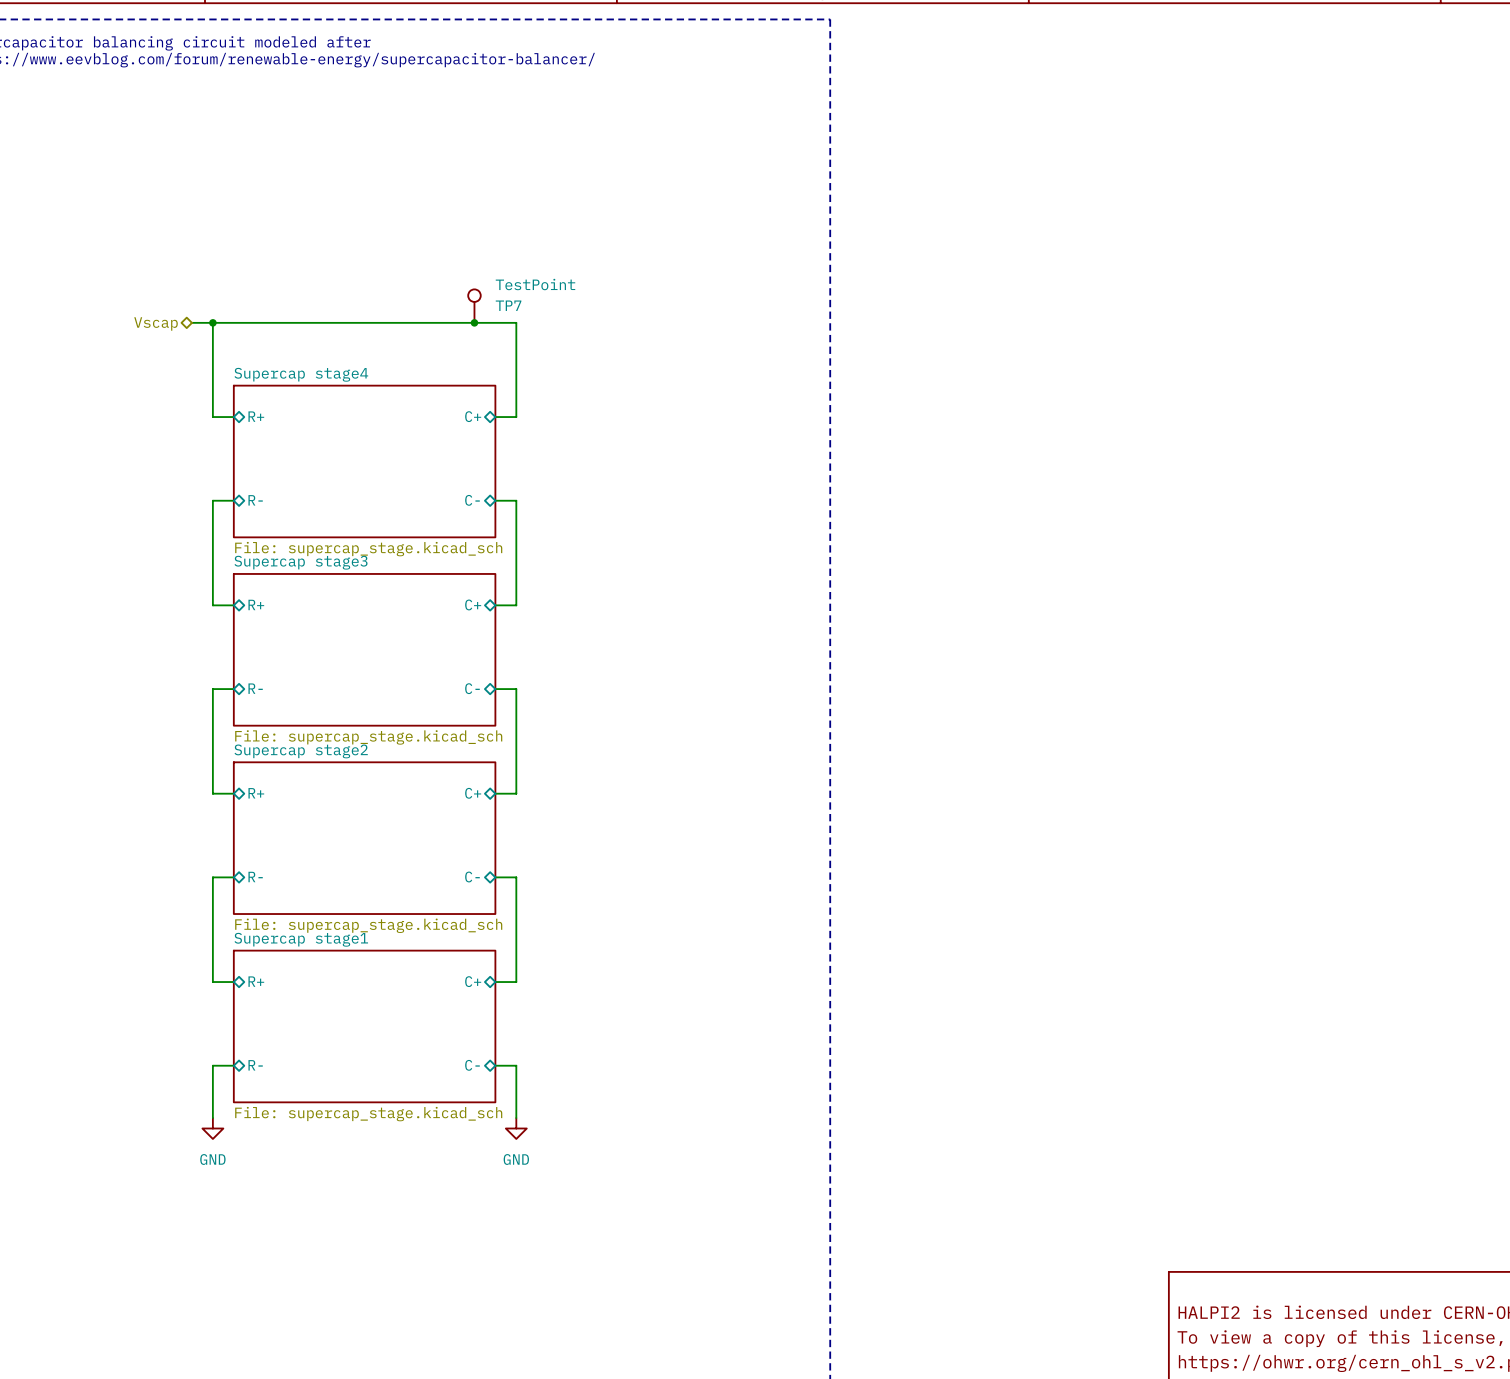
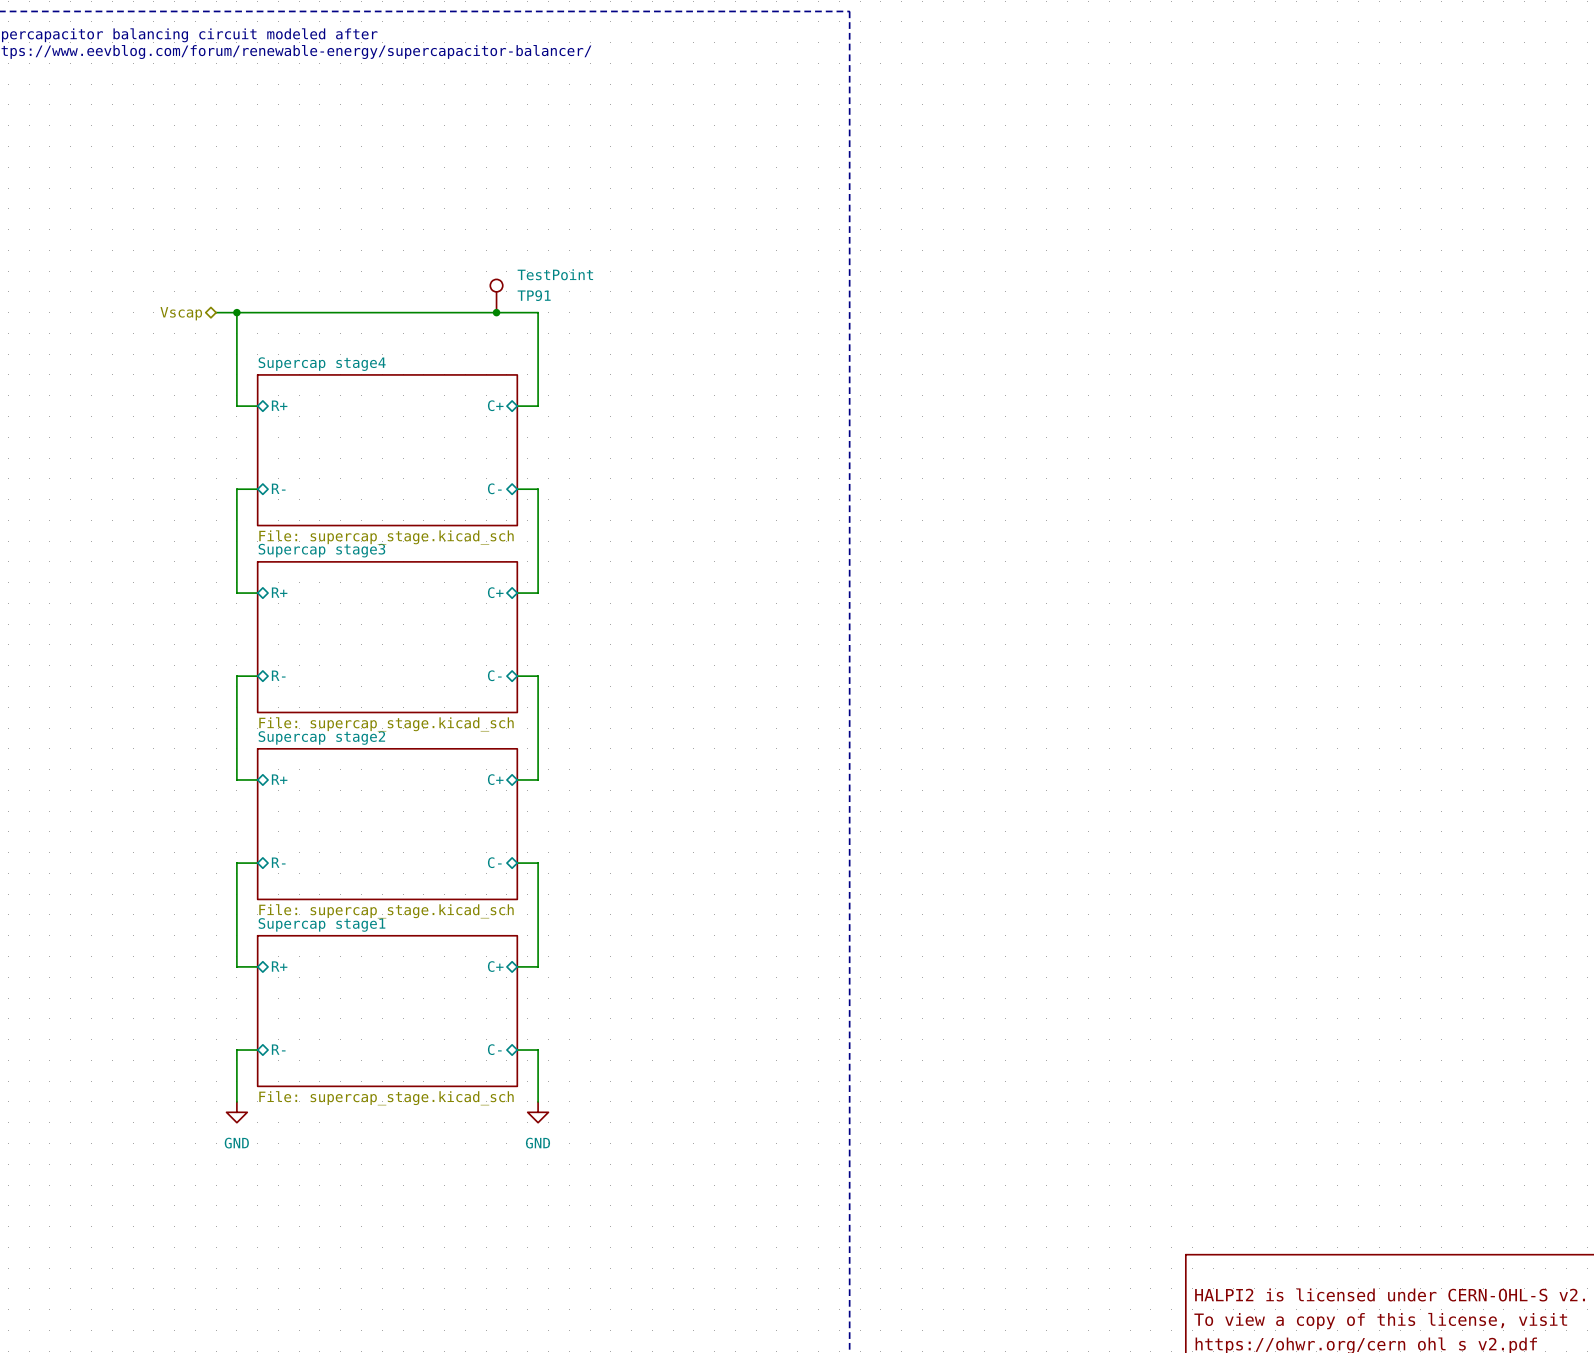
TP7 name: TP7 (508, 305) -> TP91 (534, 295)

